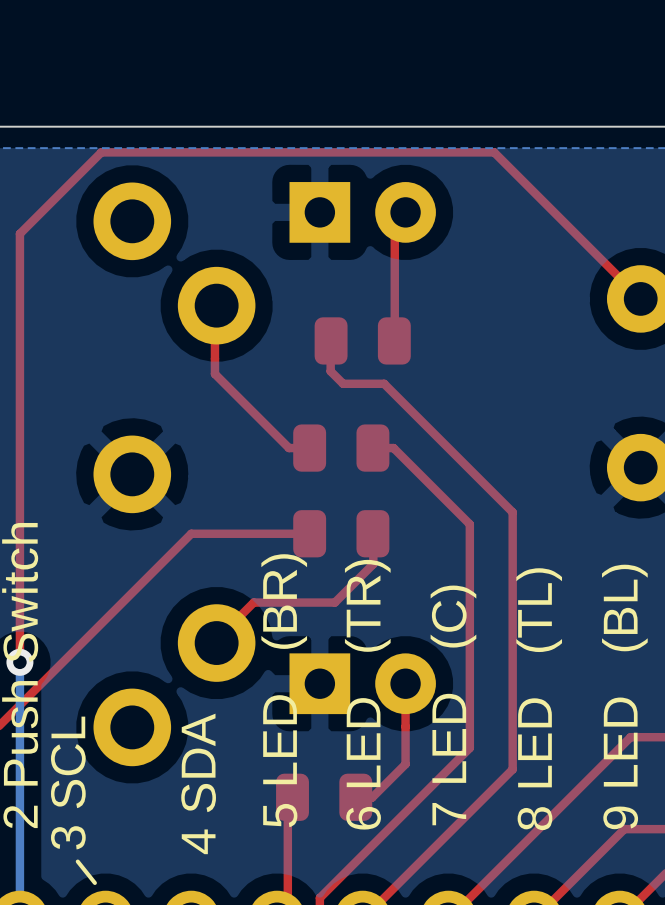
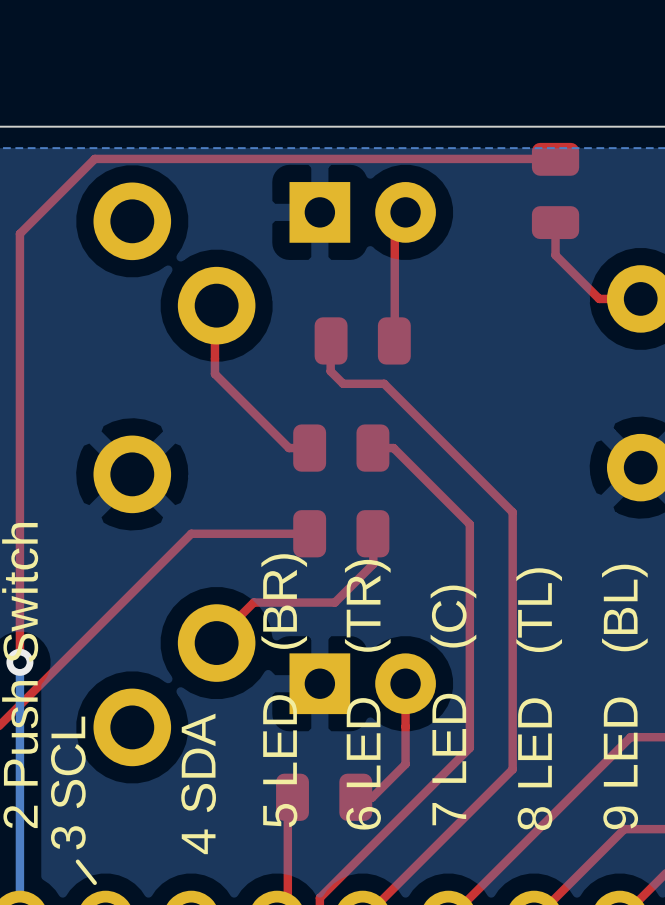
top track: (94, 158) (101, 152) (494, 152) (640, 298) -> (94, 158) (555, 158)
part: none -> (555, 190)
top track: none -> (555, 223) (555, 255) (599, 298) (640, 298)

